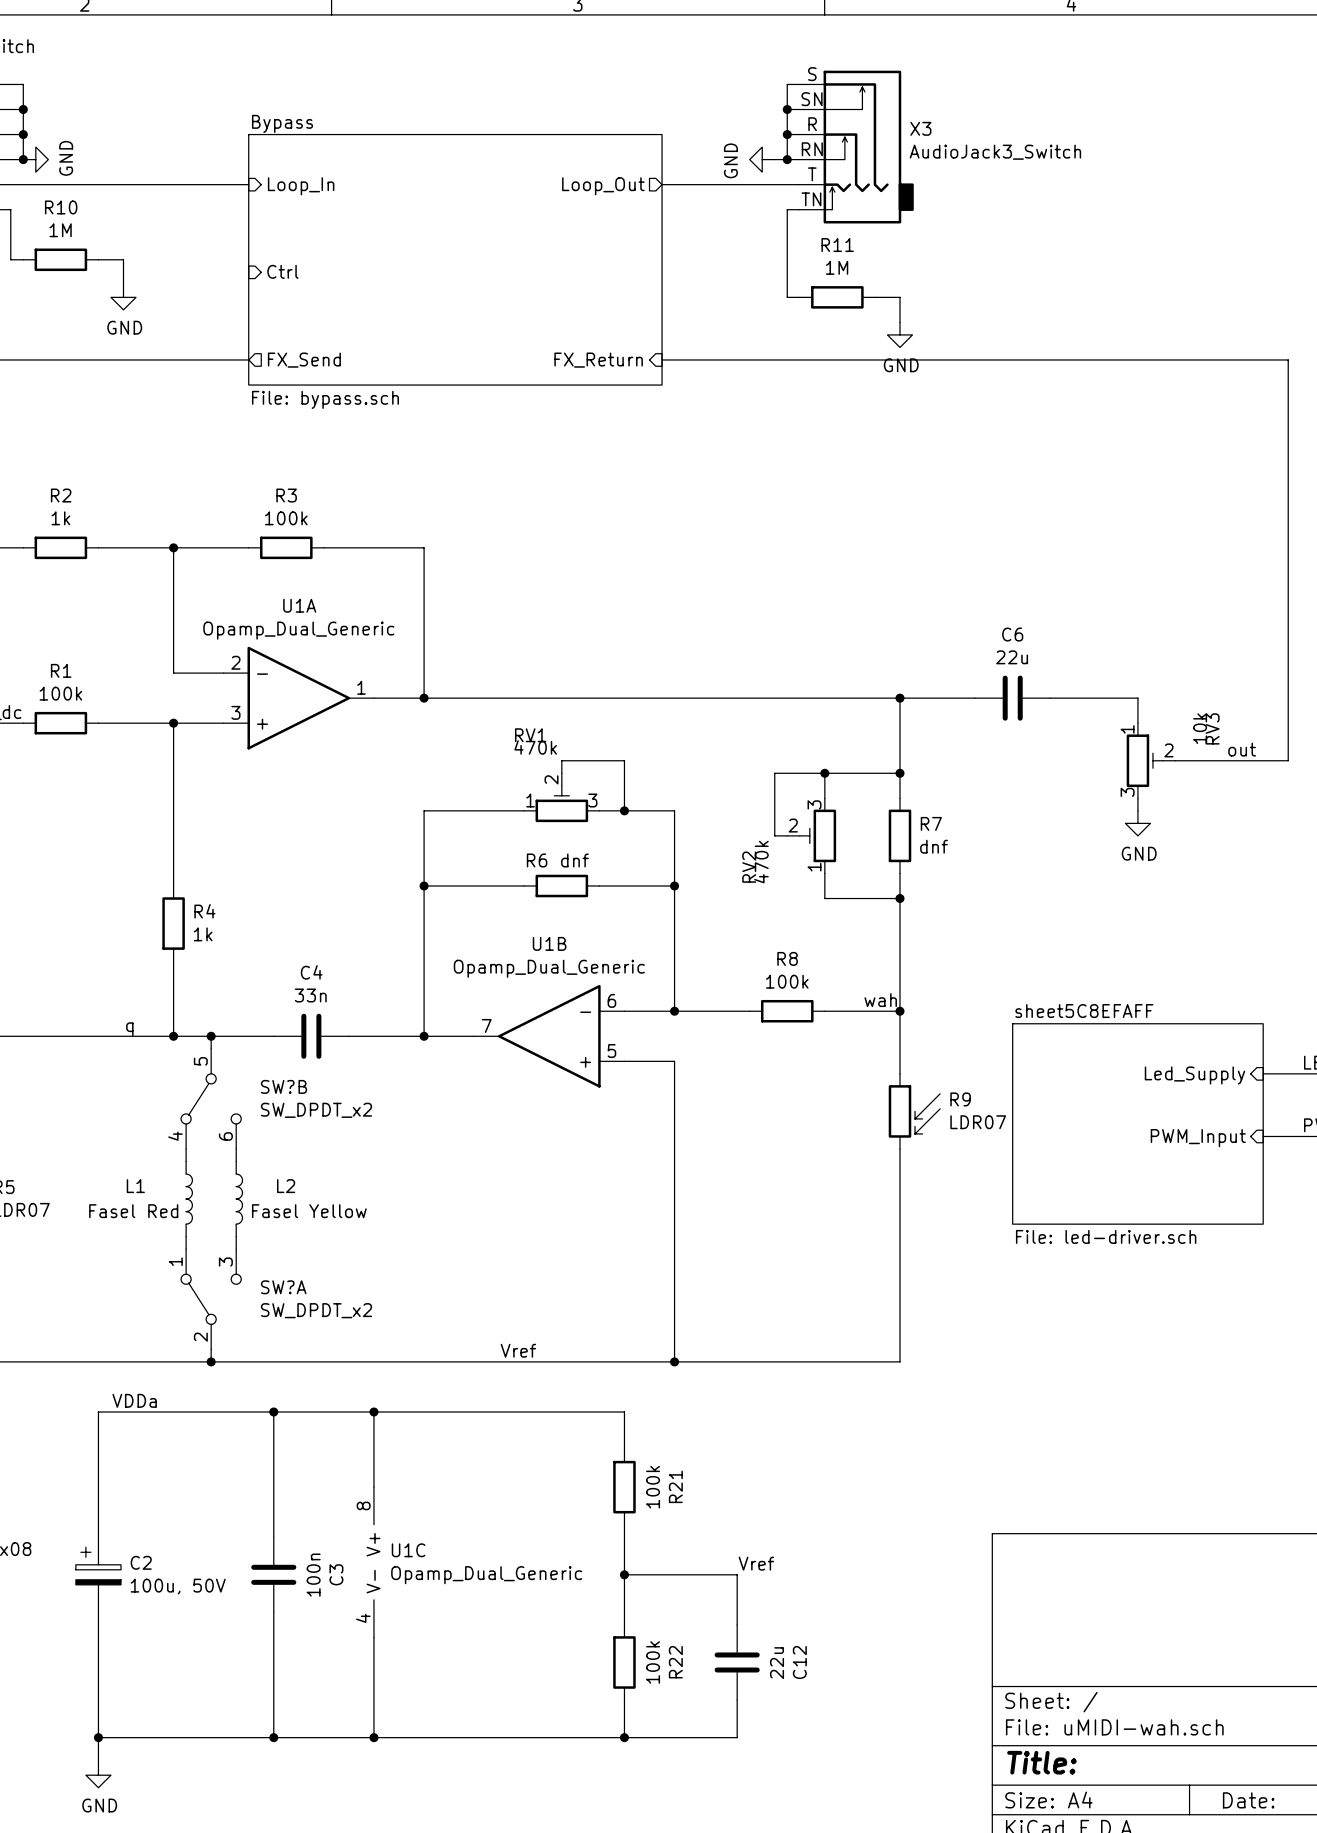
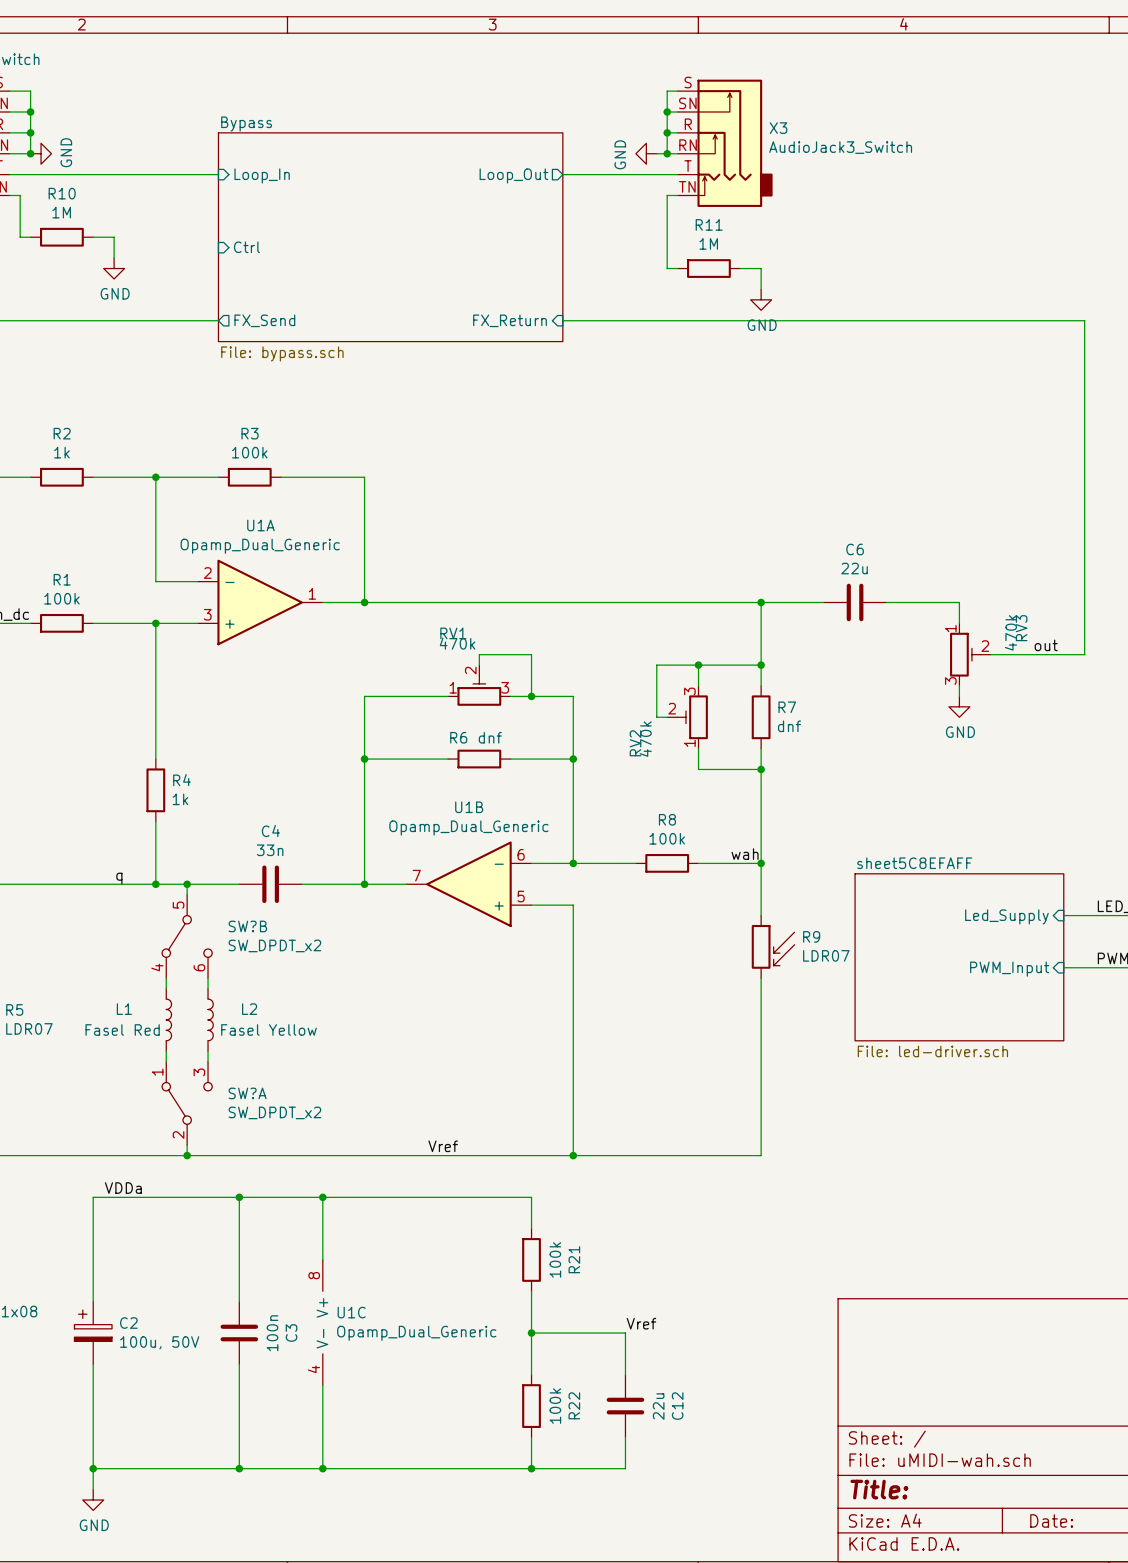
RV3 value: 10k (1200, 728) -> 470k (1010, 632)

